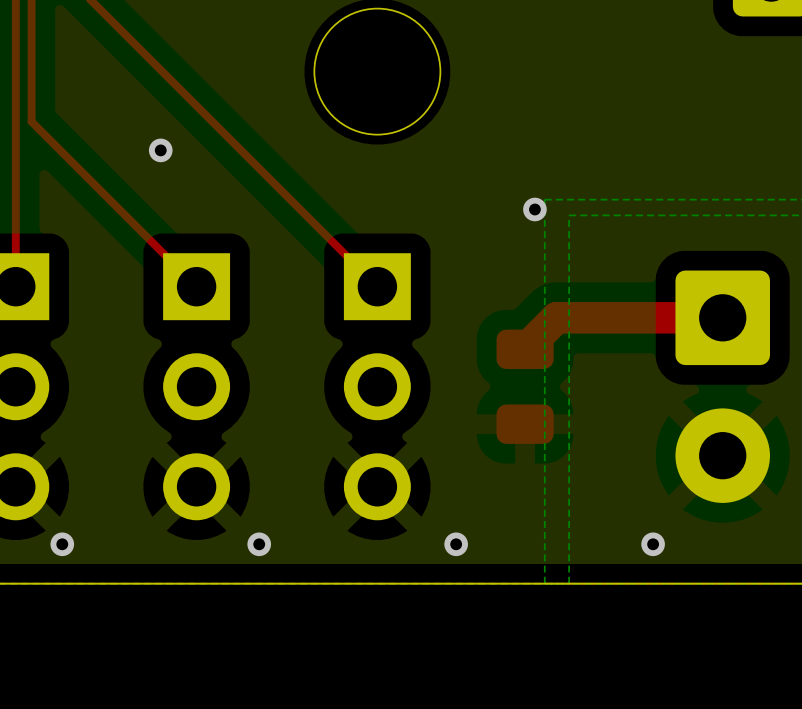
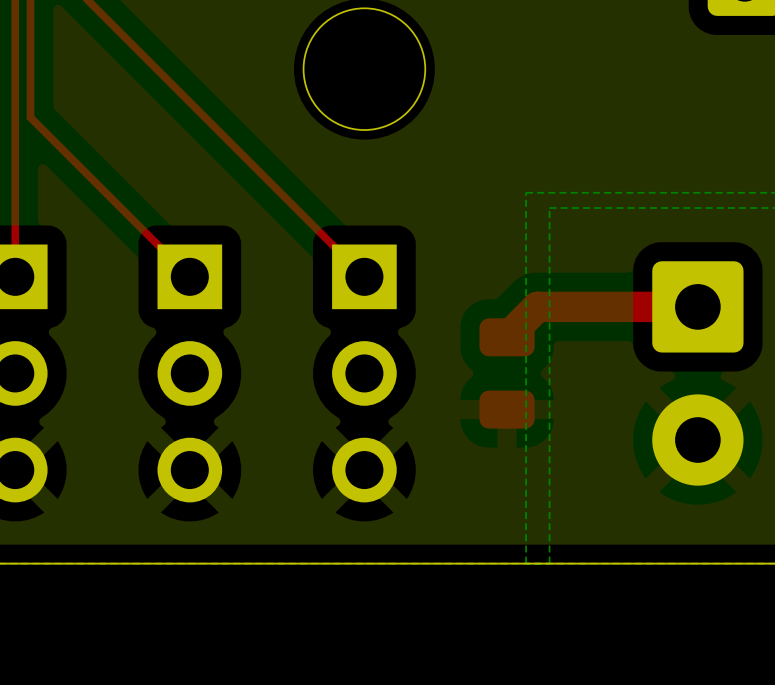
via: (160, 150) -> none
via: (534, 209) -> none
via: (62, 544) -> none
via: (259, 544) -> none
via: (456, 544) -> none
via: (653, 544) -> none

